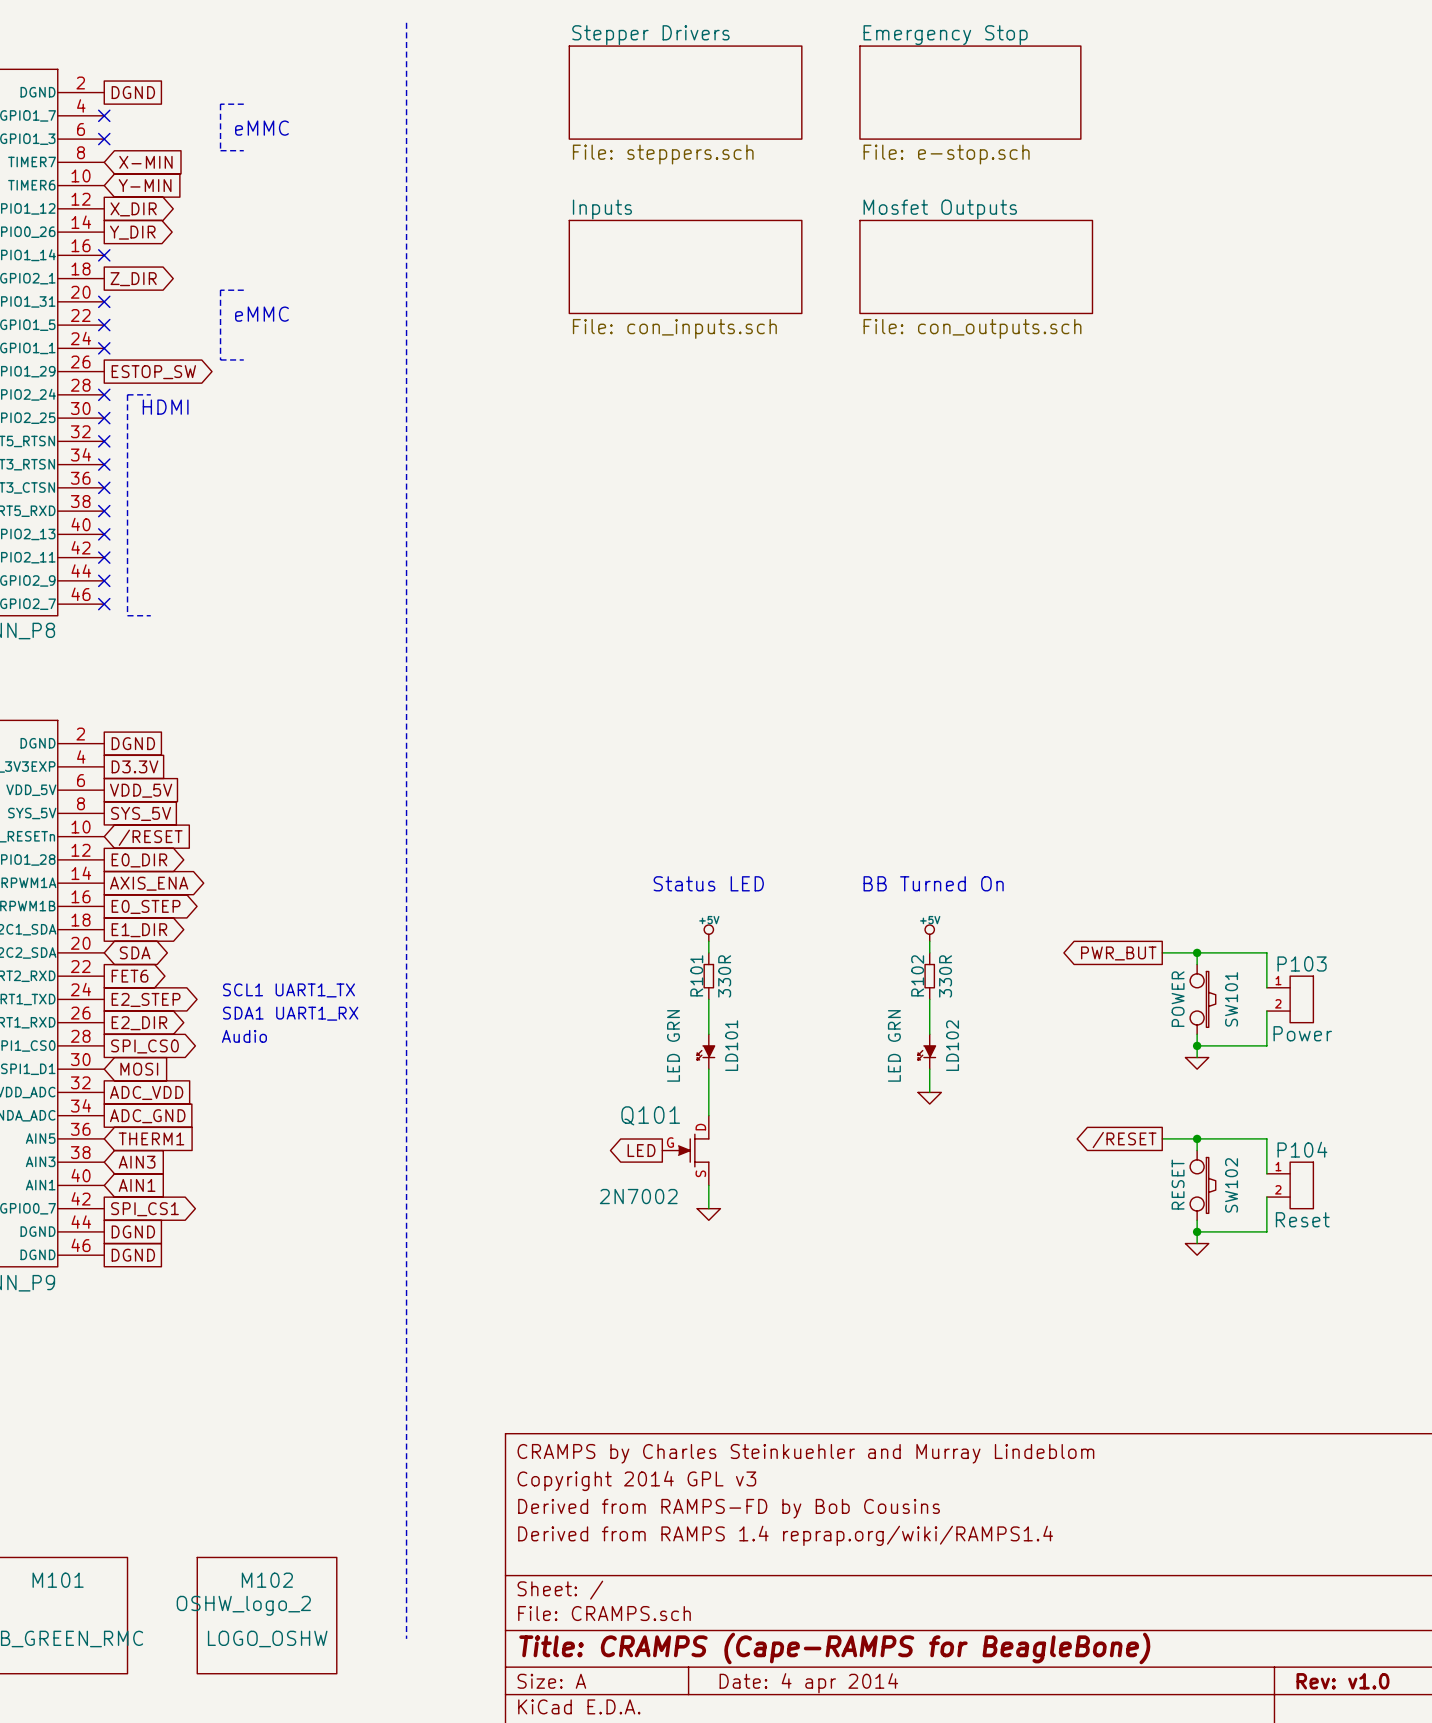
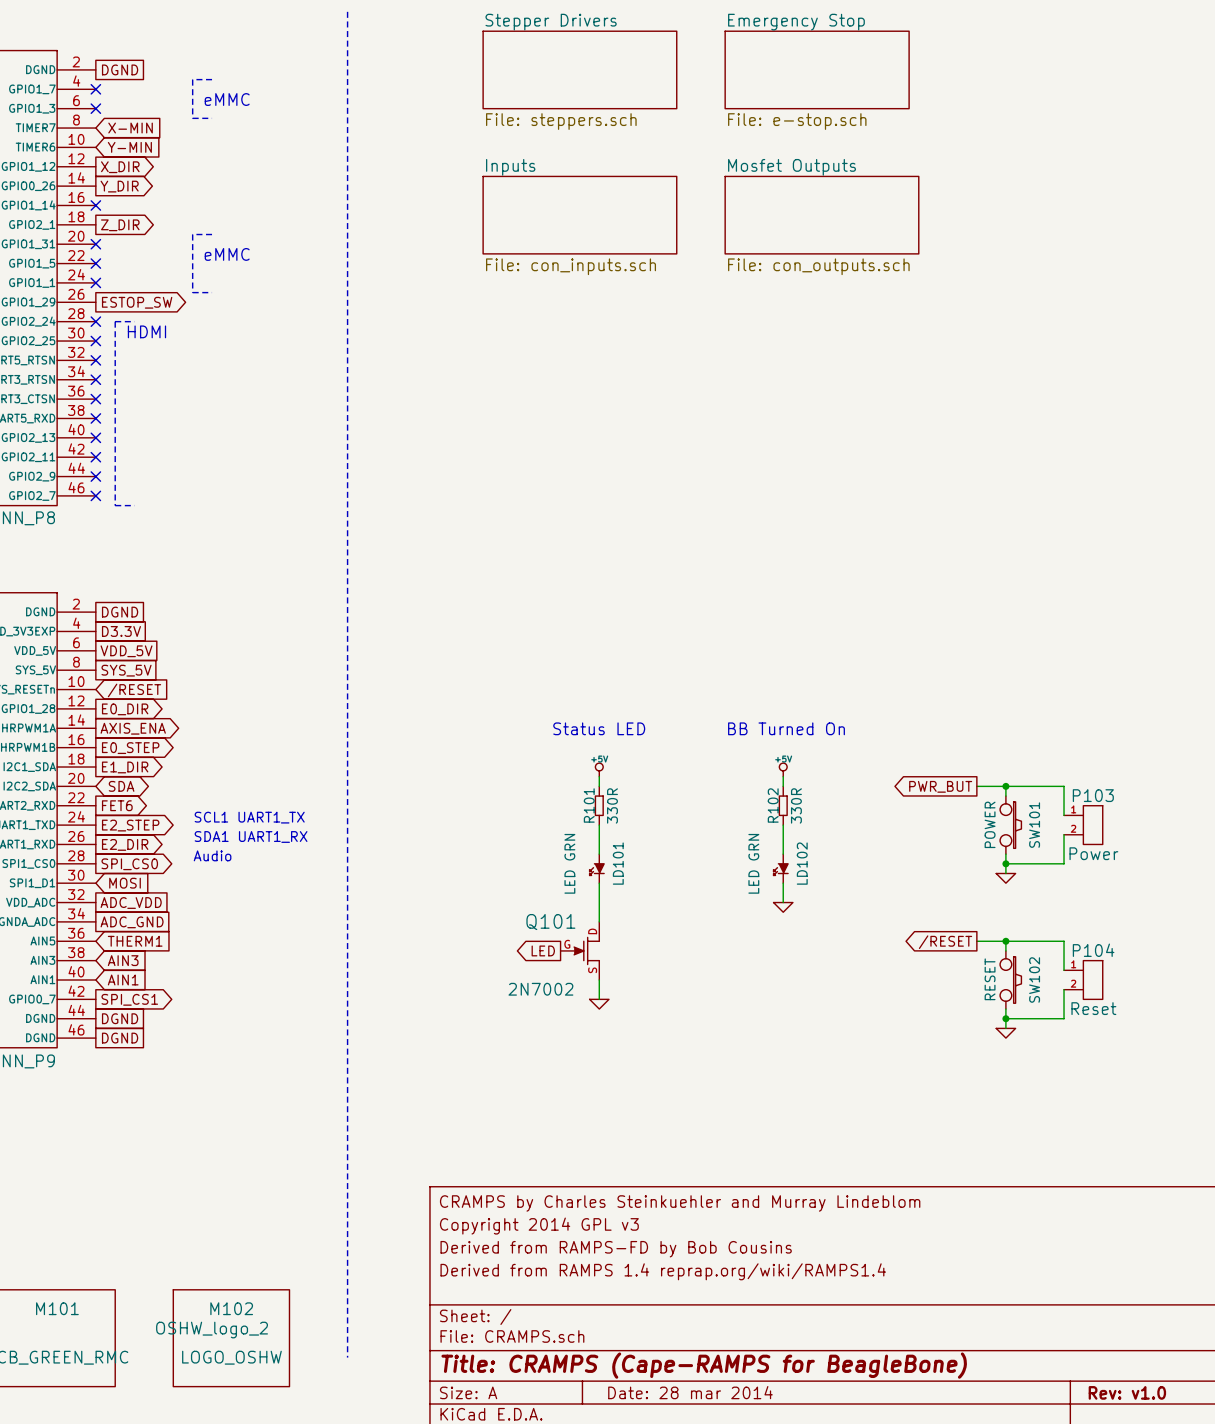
title block: Date: 4 apr 2014 (808, 1683) -> Date: 28 mar 2014 (690, 1392)

